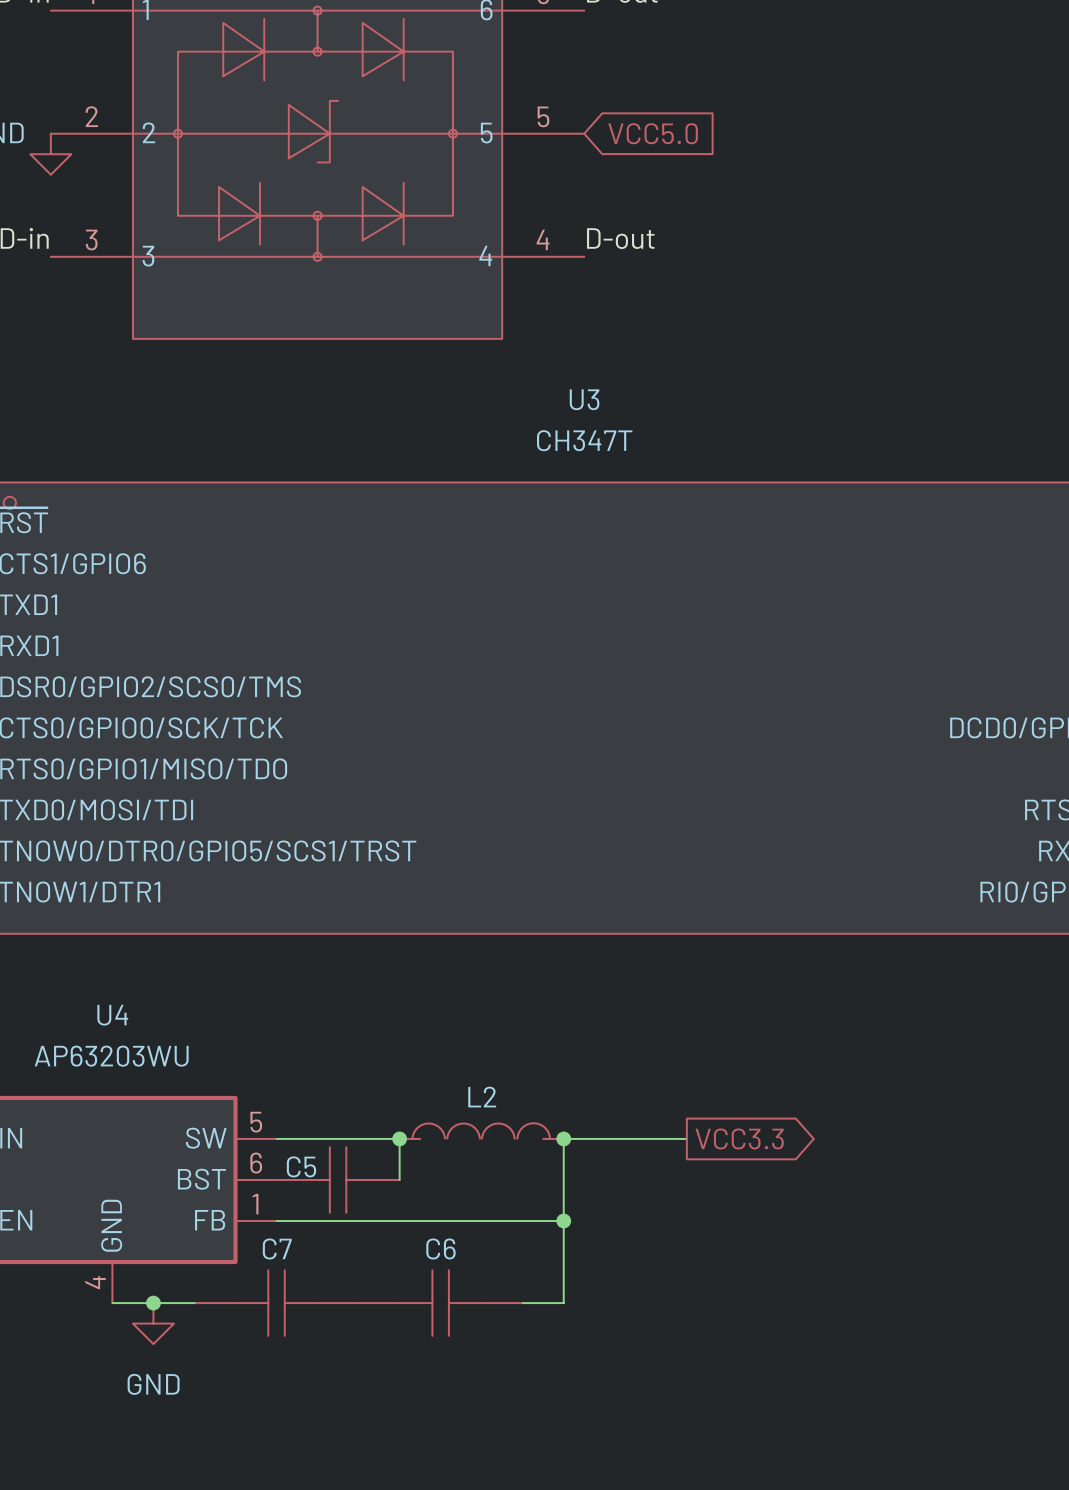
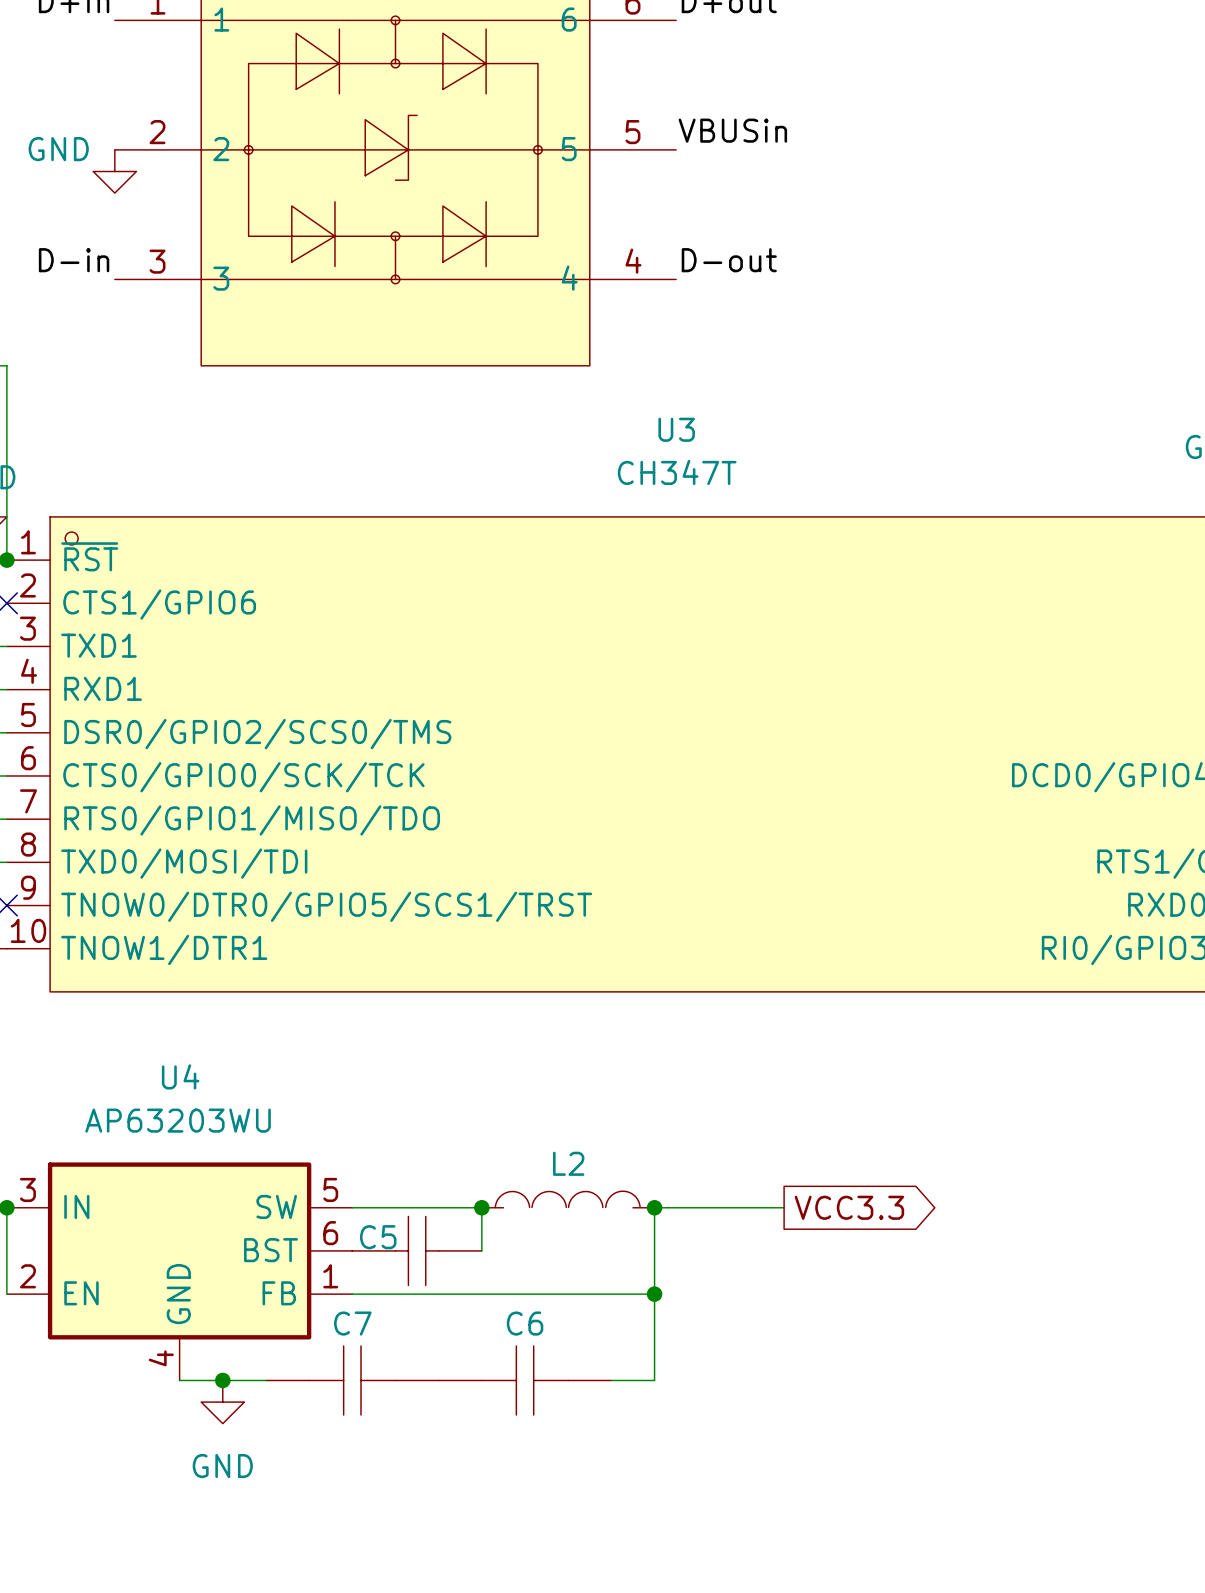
label: none -> VBUSin (732, 130)
global label: VCC5.0 (653, 133) -> none

